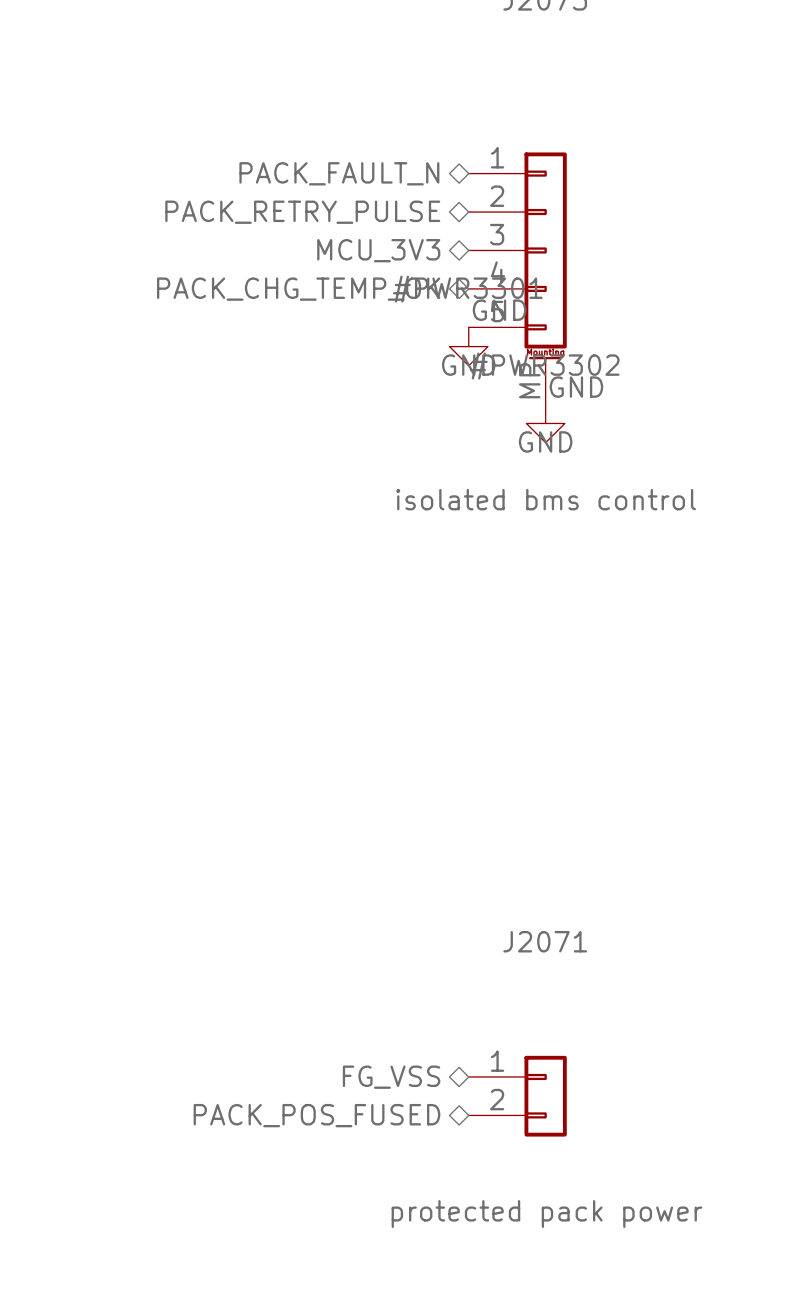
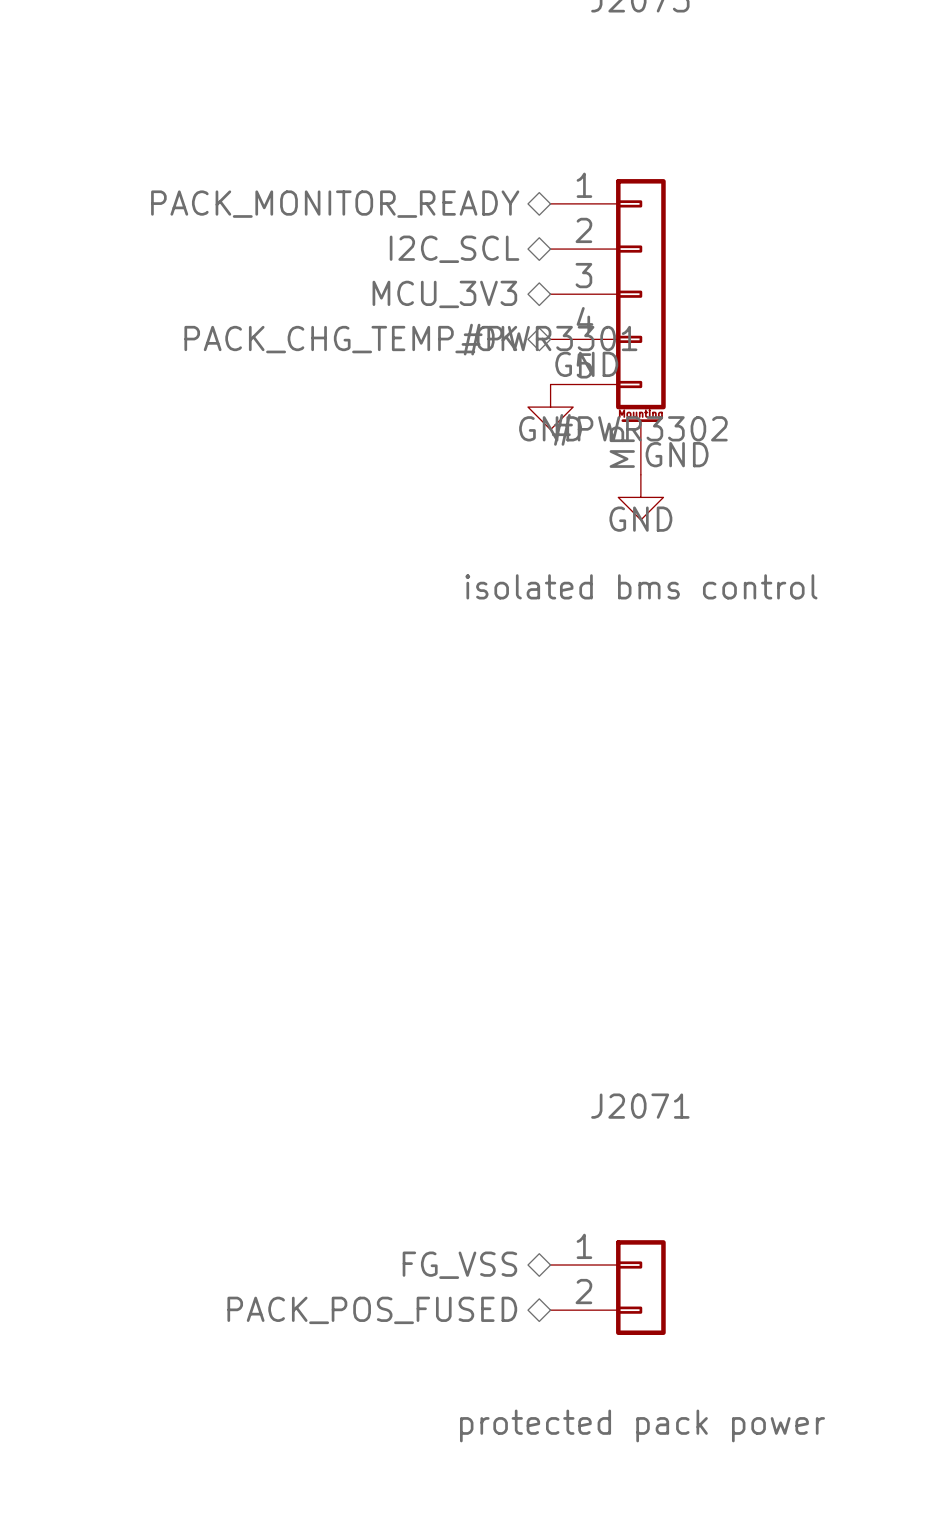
hierarchical label: PACK_FAULT_N (339, 173) -> PACK_MONITOR_READY (335, 204)
hierarchical label: PACK_RETRY_PULSE (302, 212) -> I2C_SCL (454, 249)

